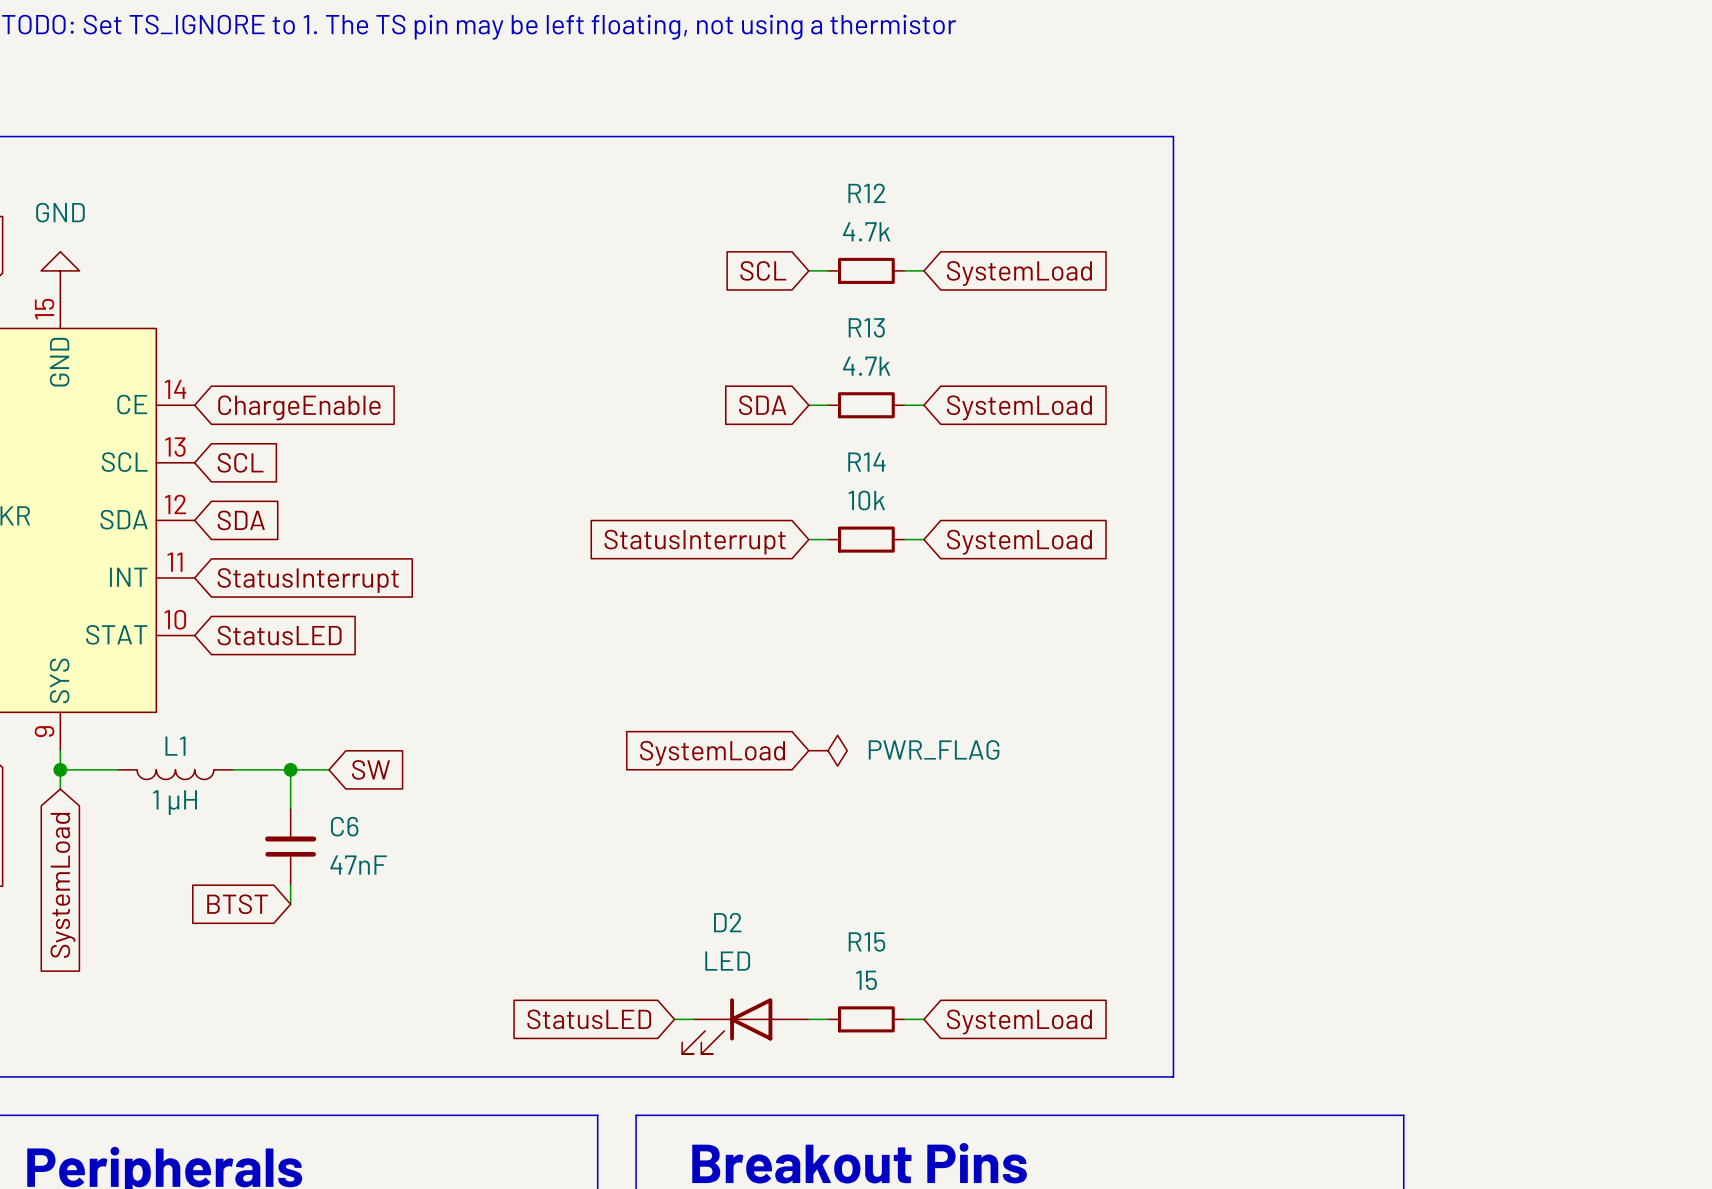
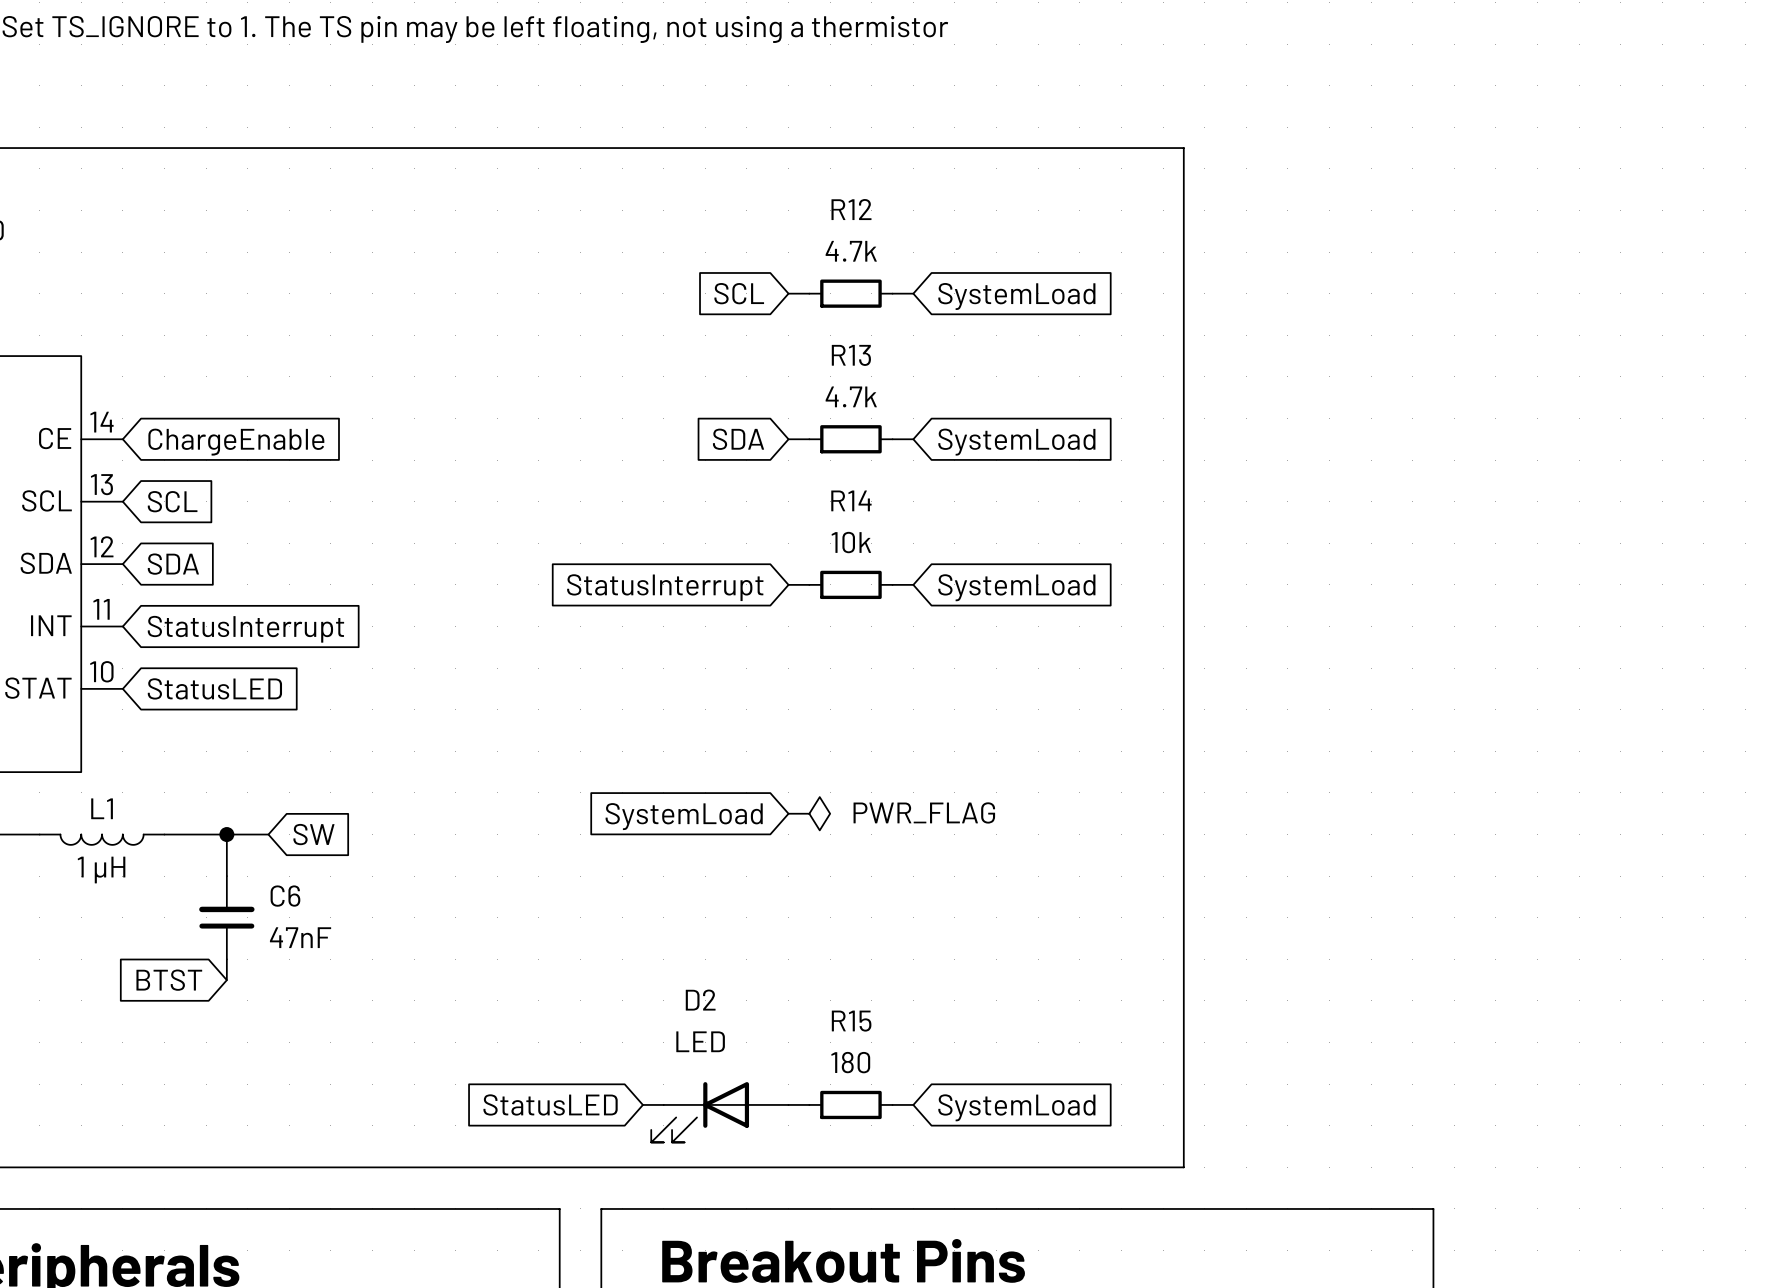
R15 value: 15 (866, 980) -> 180 (850, 1062)

